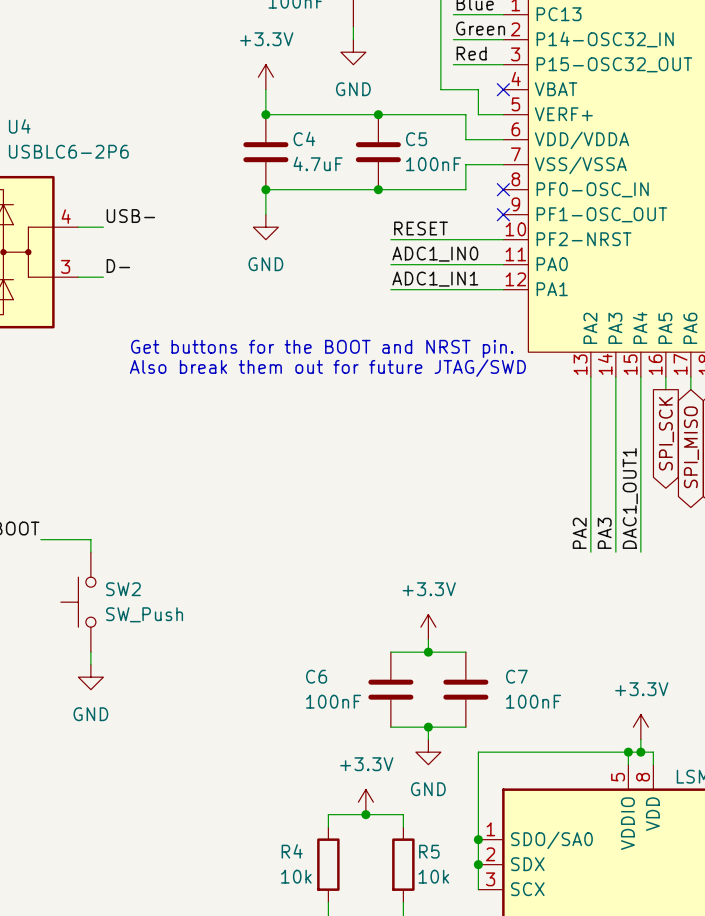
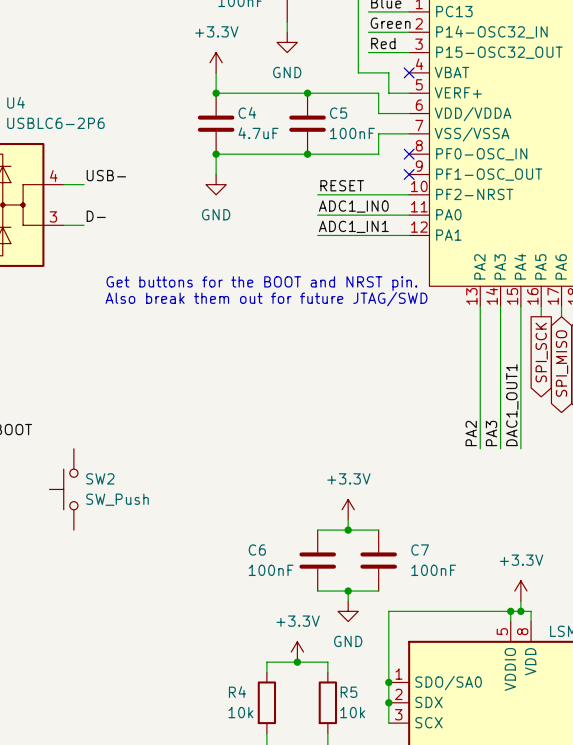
wire: (40, 539) (90, 539) (90, 552) -> none
wire: (90, 652) (90, 664) -> none
power symbol: GND (90, 677) -> none

